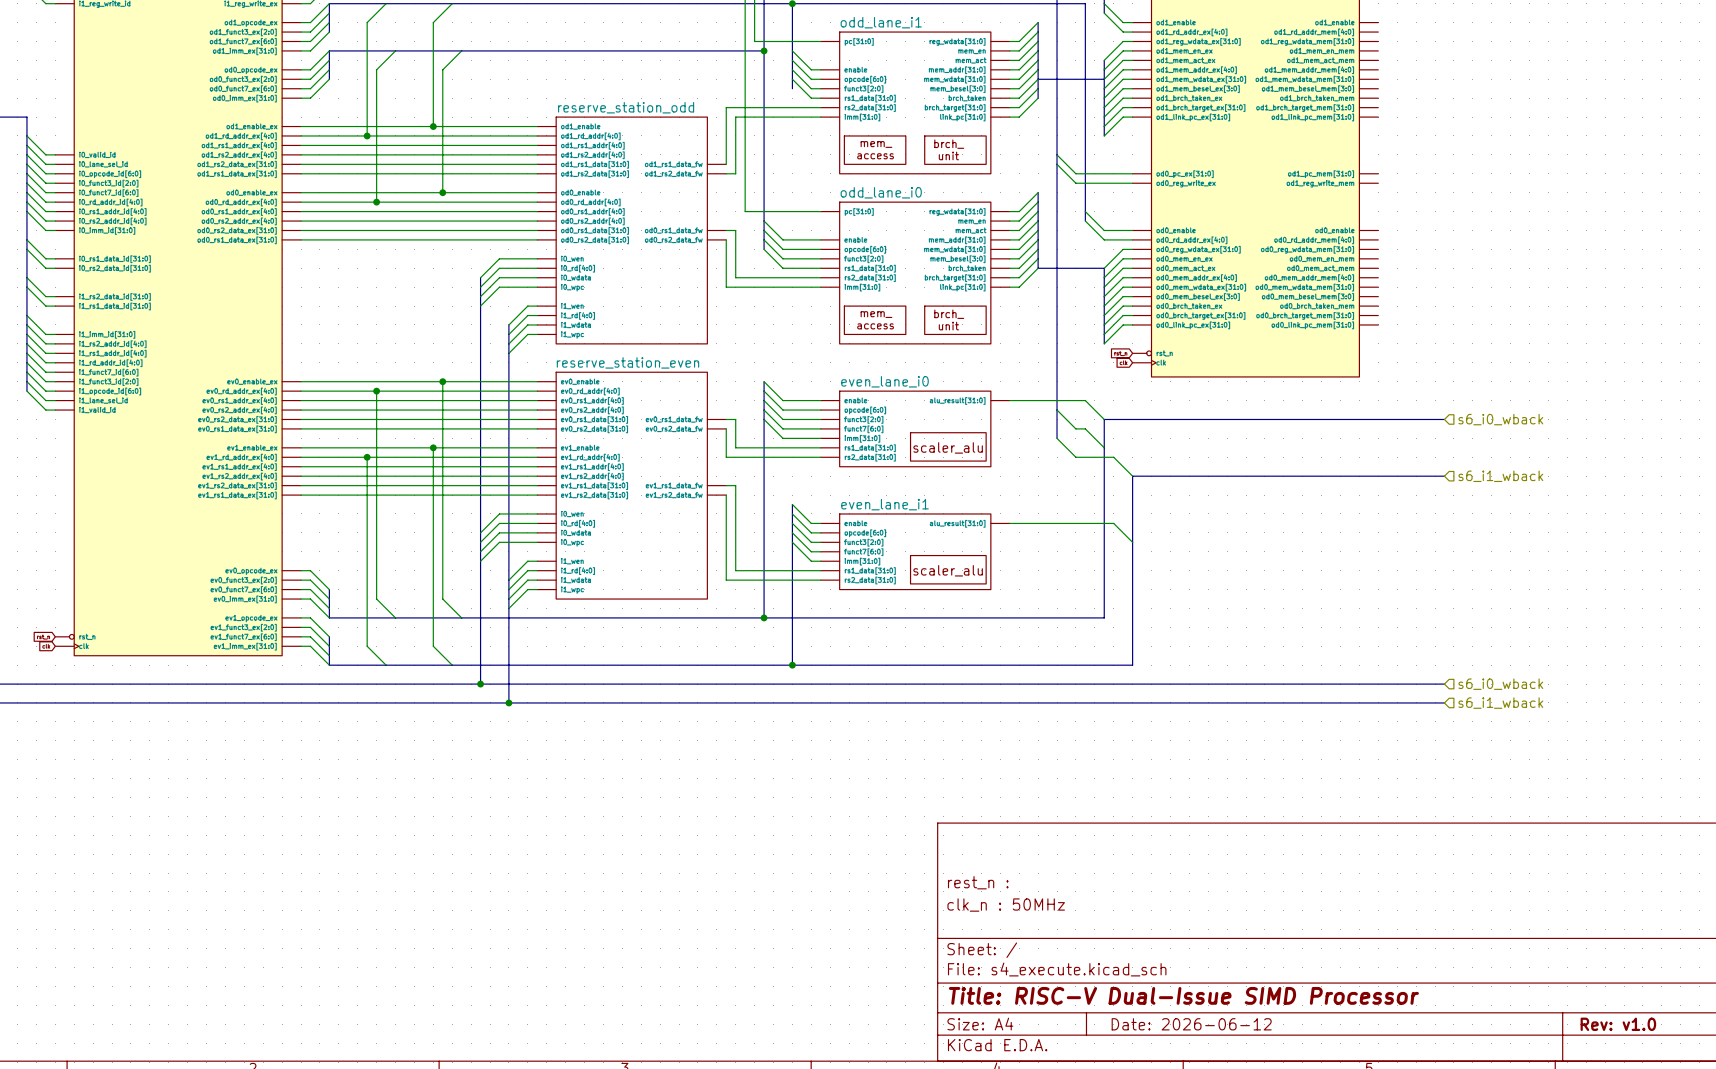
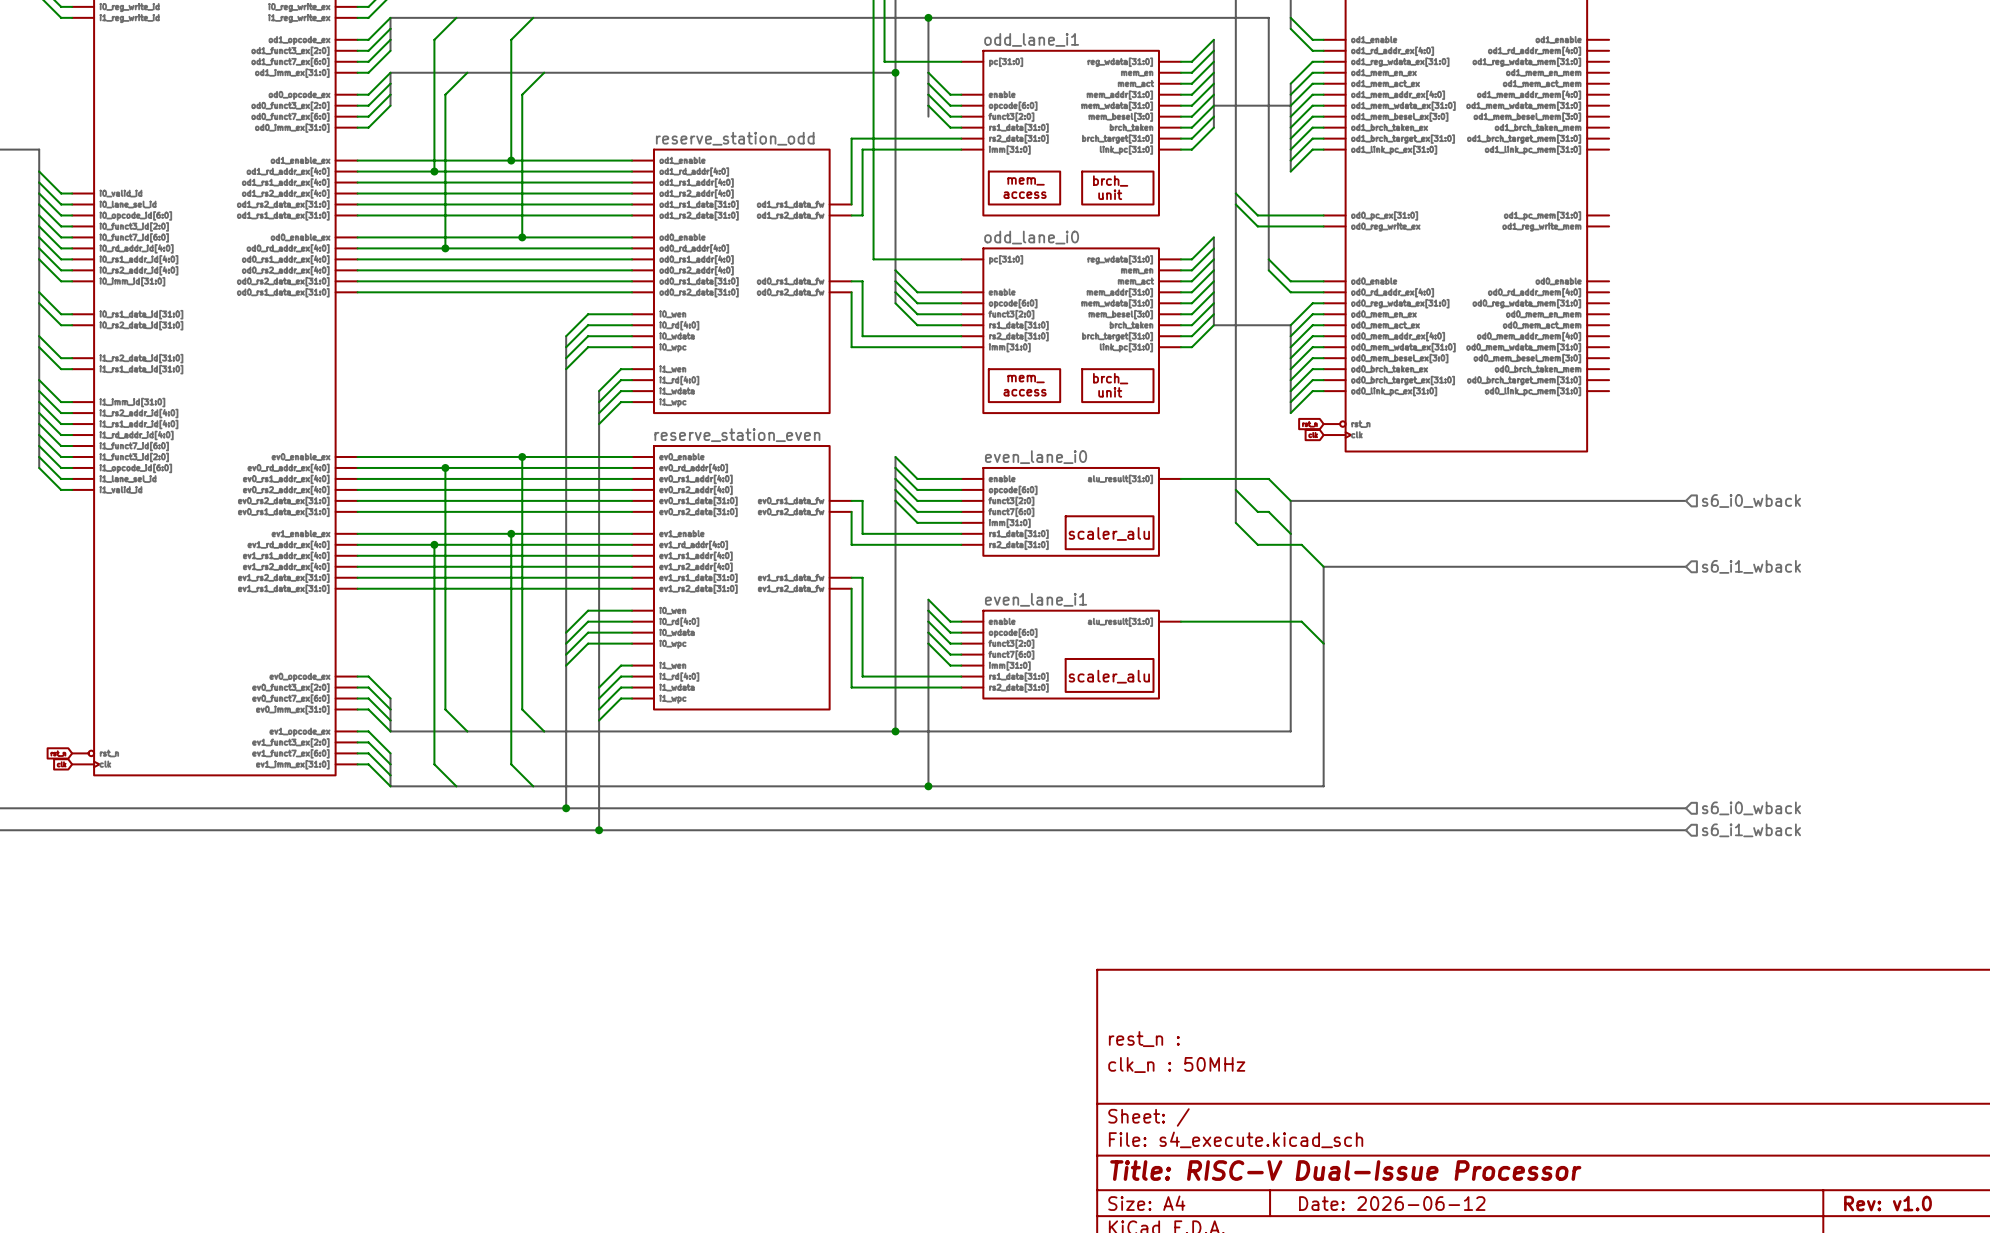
title block: Title: RISC-V Dual-Issue SIMD Processor (1183, 995) -> Title: RISC-V Dual-Issue Processor (1345, 1170)

